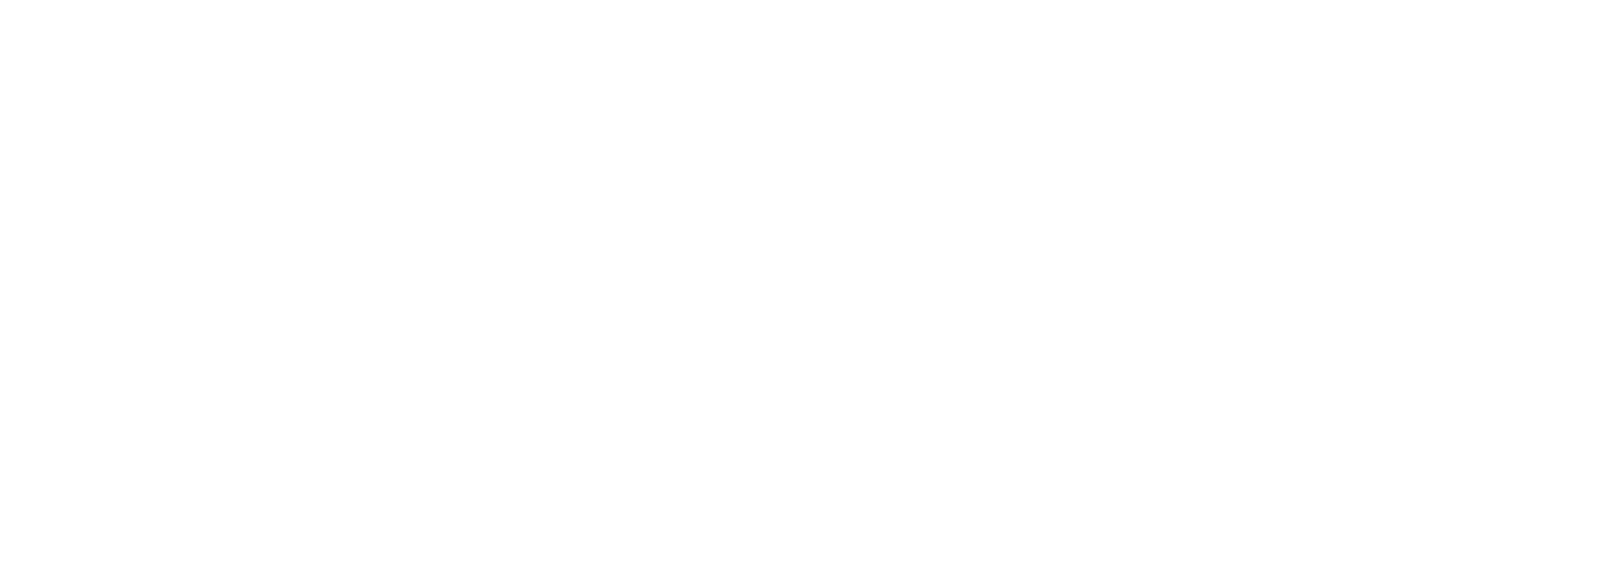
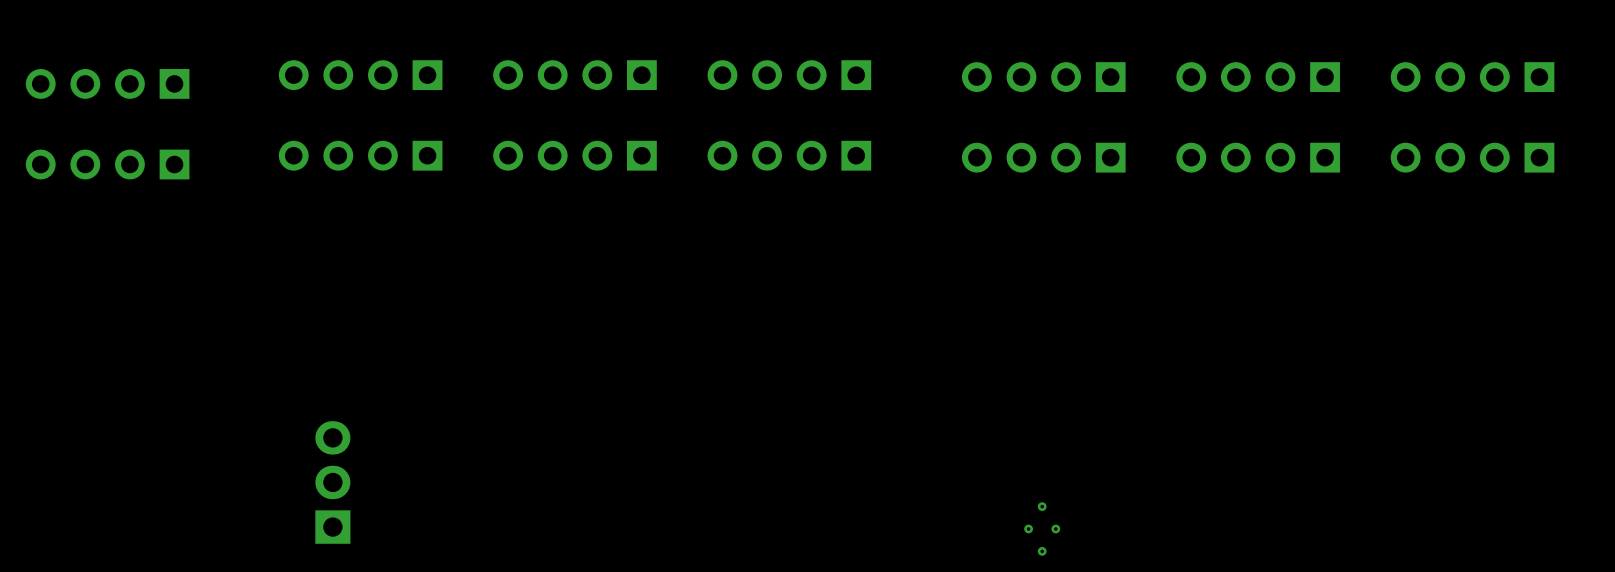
part: none -> (360, 75)
part: none -> (575, 75)
part: none -> (789, 75)
part: none -> (1043, 77)
part: none -> (1258, 77)
part: none -> (1472, 77)
part: none -> (107, 83)
part: none -> (360, 155)
part: none -> (575, 155)
part: none -> (789, 155)
part: none -> (1043, 157)
part: none -> (1258, 157)
part: none -> (1472, 157)
part: none -> (107, 164)
part: none -> (332, 482)
part: none -> (1042, 528)

